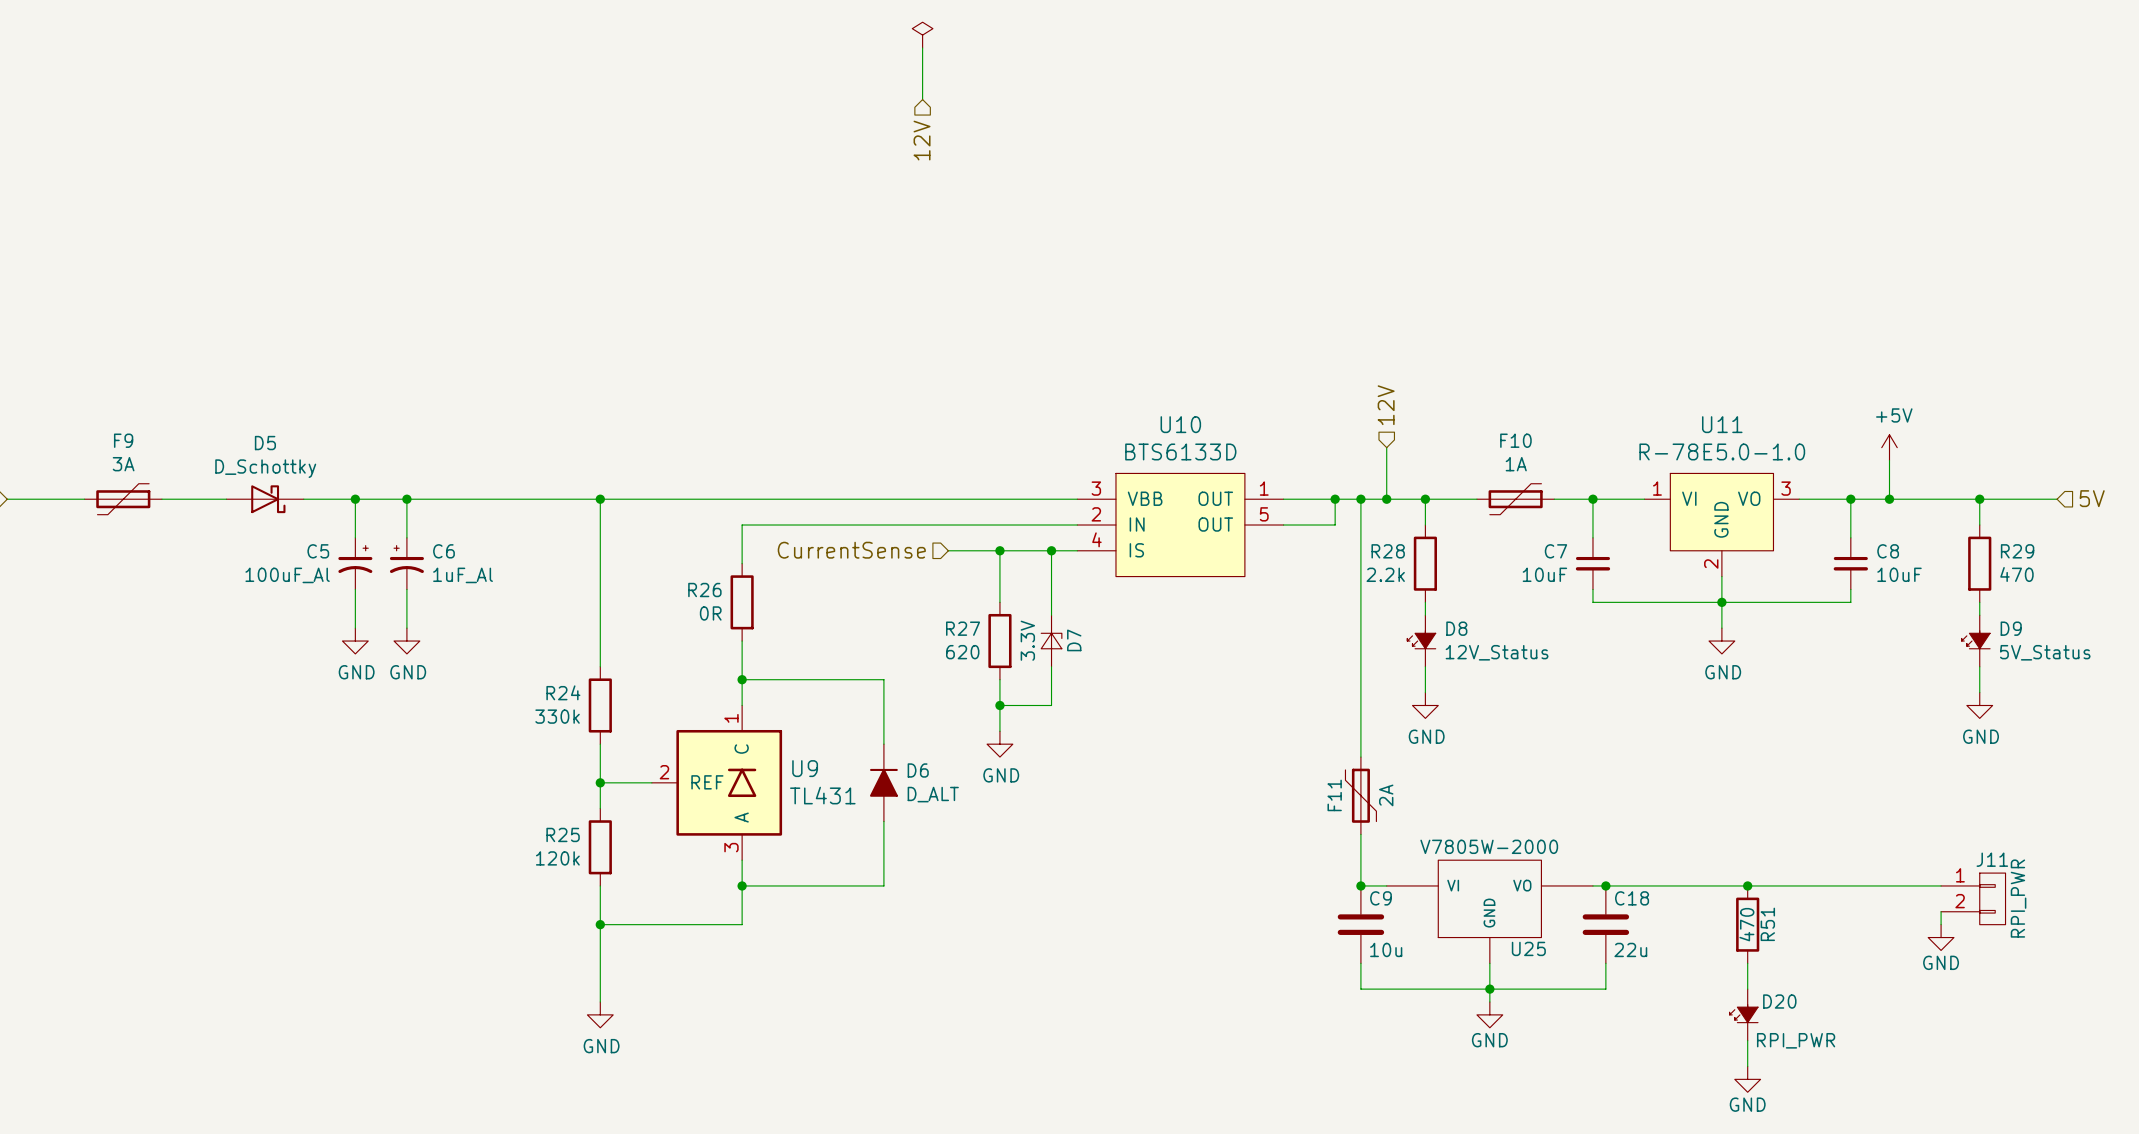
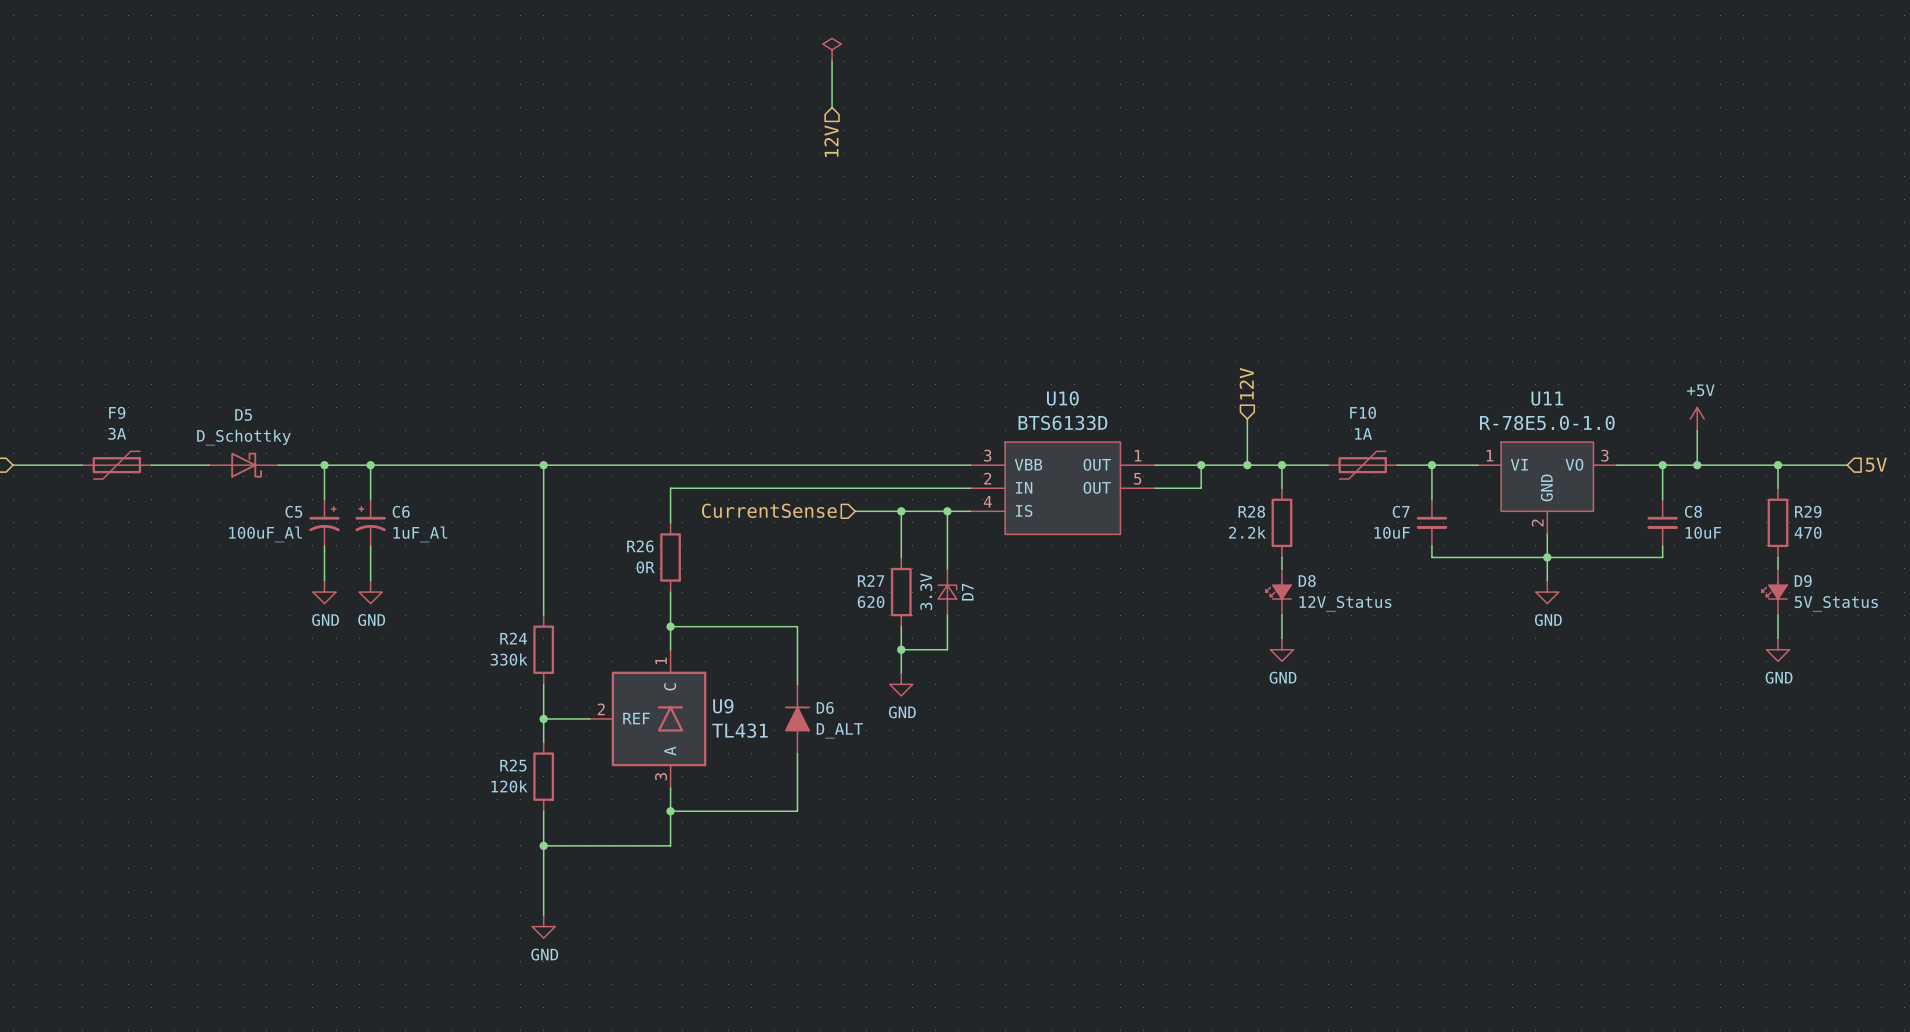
wire: (1360, 499) (1360, 757) -> none
junction: (1360, 499) -> none
F11: 2A (1360, 795) -> none
wire: (1360, 834) (1360, 885) (1386, 885) -> none
junction: (1360, 885) -> none
wire: (1592, 885) (1941, 885) -> none
junction: (1605, 885) -> none
junction: (1747, 885) -> none
J11: RPI_PWR (1973, 898) -> none
U25: V7805W-2000 (1489, 911) -> none
wire: (1941, 911) (1941, 924) -> none
C9: 10u (1360, 924) -> none
C18: 22u (1605, 924) -> none
R51: 470 (1747, 924) -> none
power symbol: GND (1941, 937) -> none
wire: (1360, 963) (1360, 989) (1605, 989) (1605, 963) -> none
wire: (1489, 963) (1489, 1002) -> none
wire: (1747, 963) (1747, 989) -> none
junction: (1489, 989) -> none
power symbol: GND (1489, 1014) -> none
D20: RPI_PWR (1743, 1014) -> none
wire: (1747, 1040) (1747, 1066) -> none
power symbol: GND (1747, 1079) -> none

